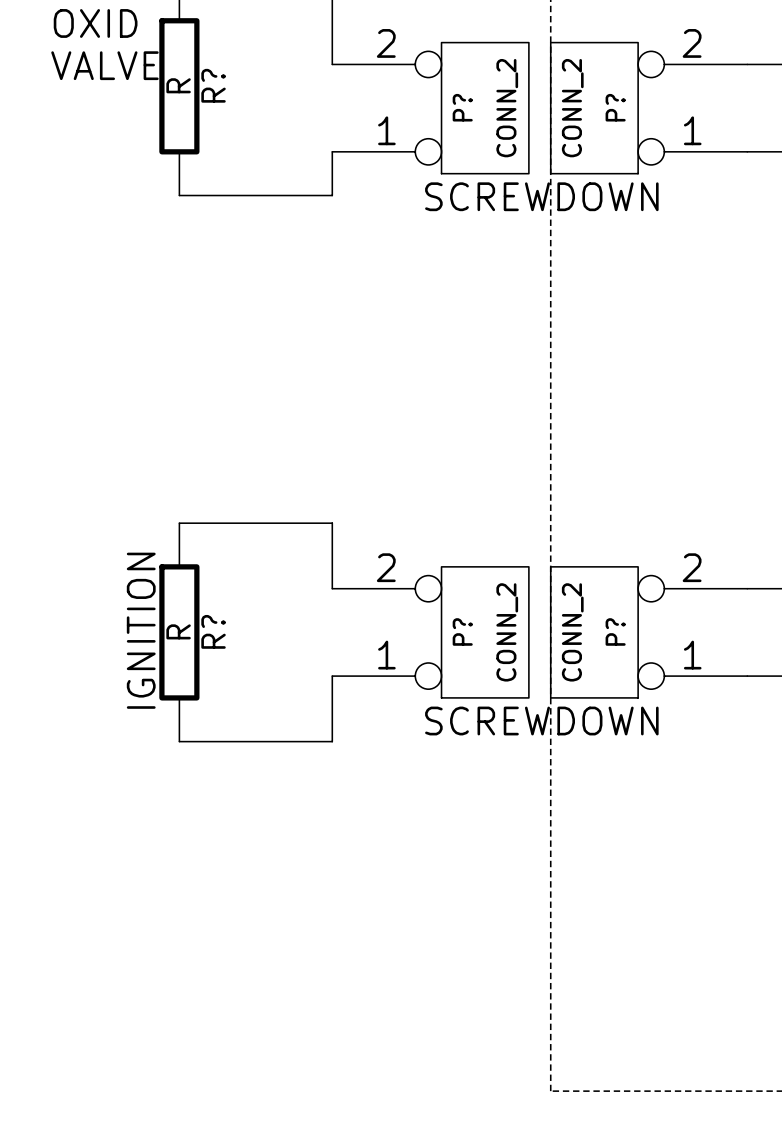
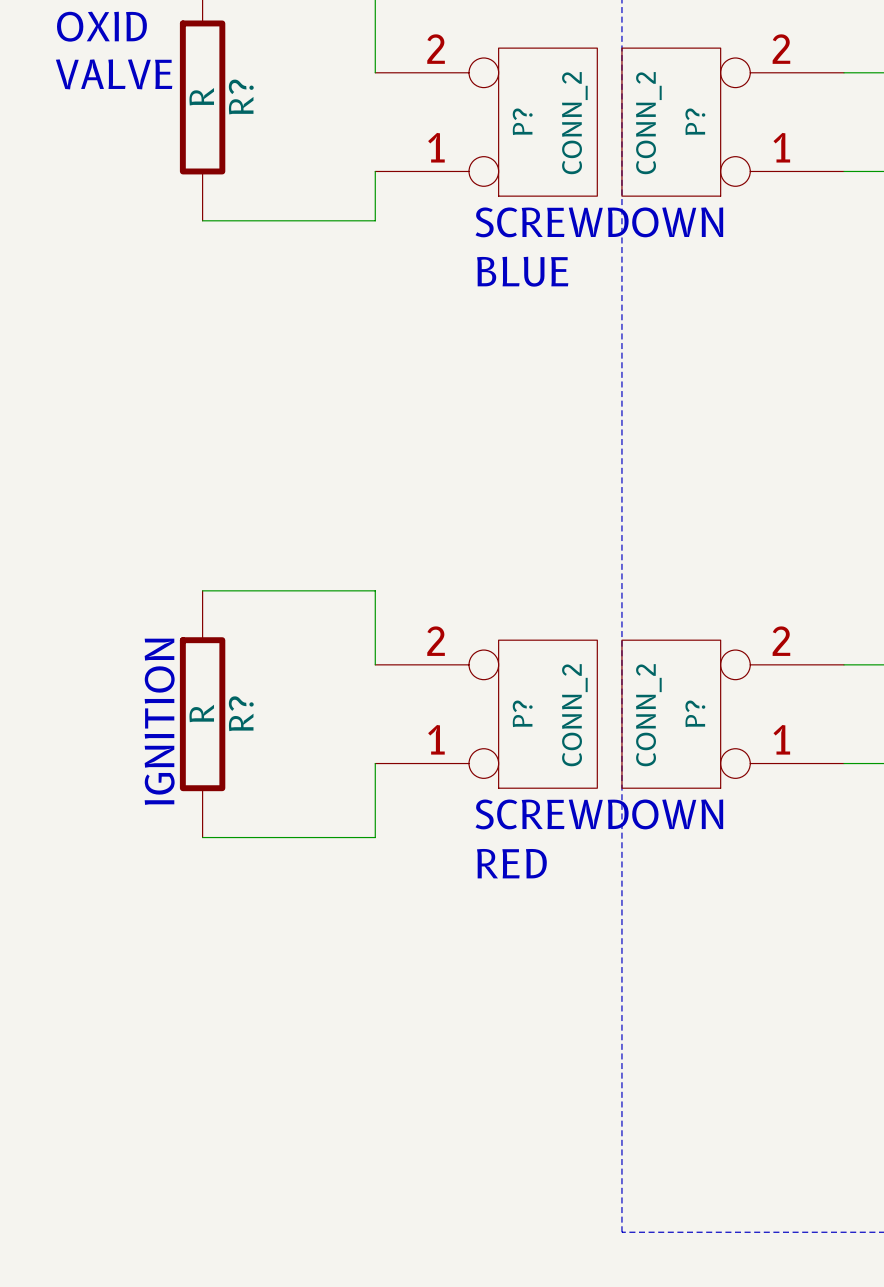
text: none -> BLUE (522, 271)
text: none -> RED (511, 863)

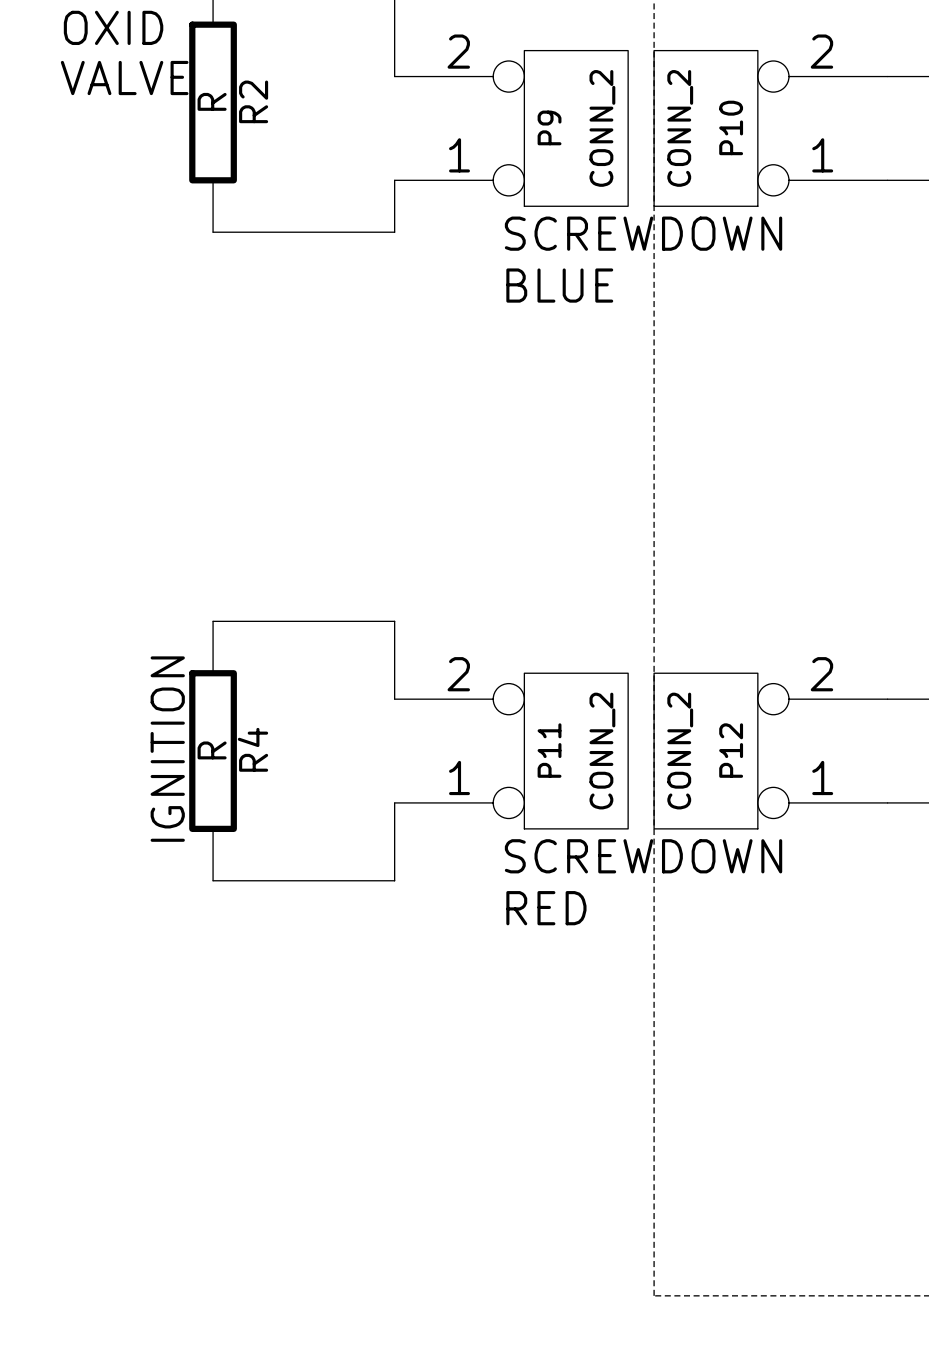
R? name: R? (241, 97) -> R2 (253, 101)
P? name: P? (522, 121) -> P9 (549, 127)
P? name: P? (695, 121) -> P10 (731, 127)
R? name: R? (241, 713) -> R4 (252, 749)
P? name: P? (522, 713) -> P11 (549, 750)
P? name: P? (695, 713) -> P12 (731, 750)

